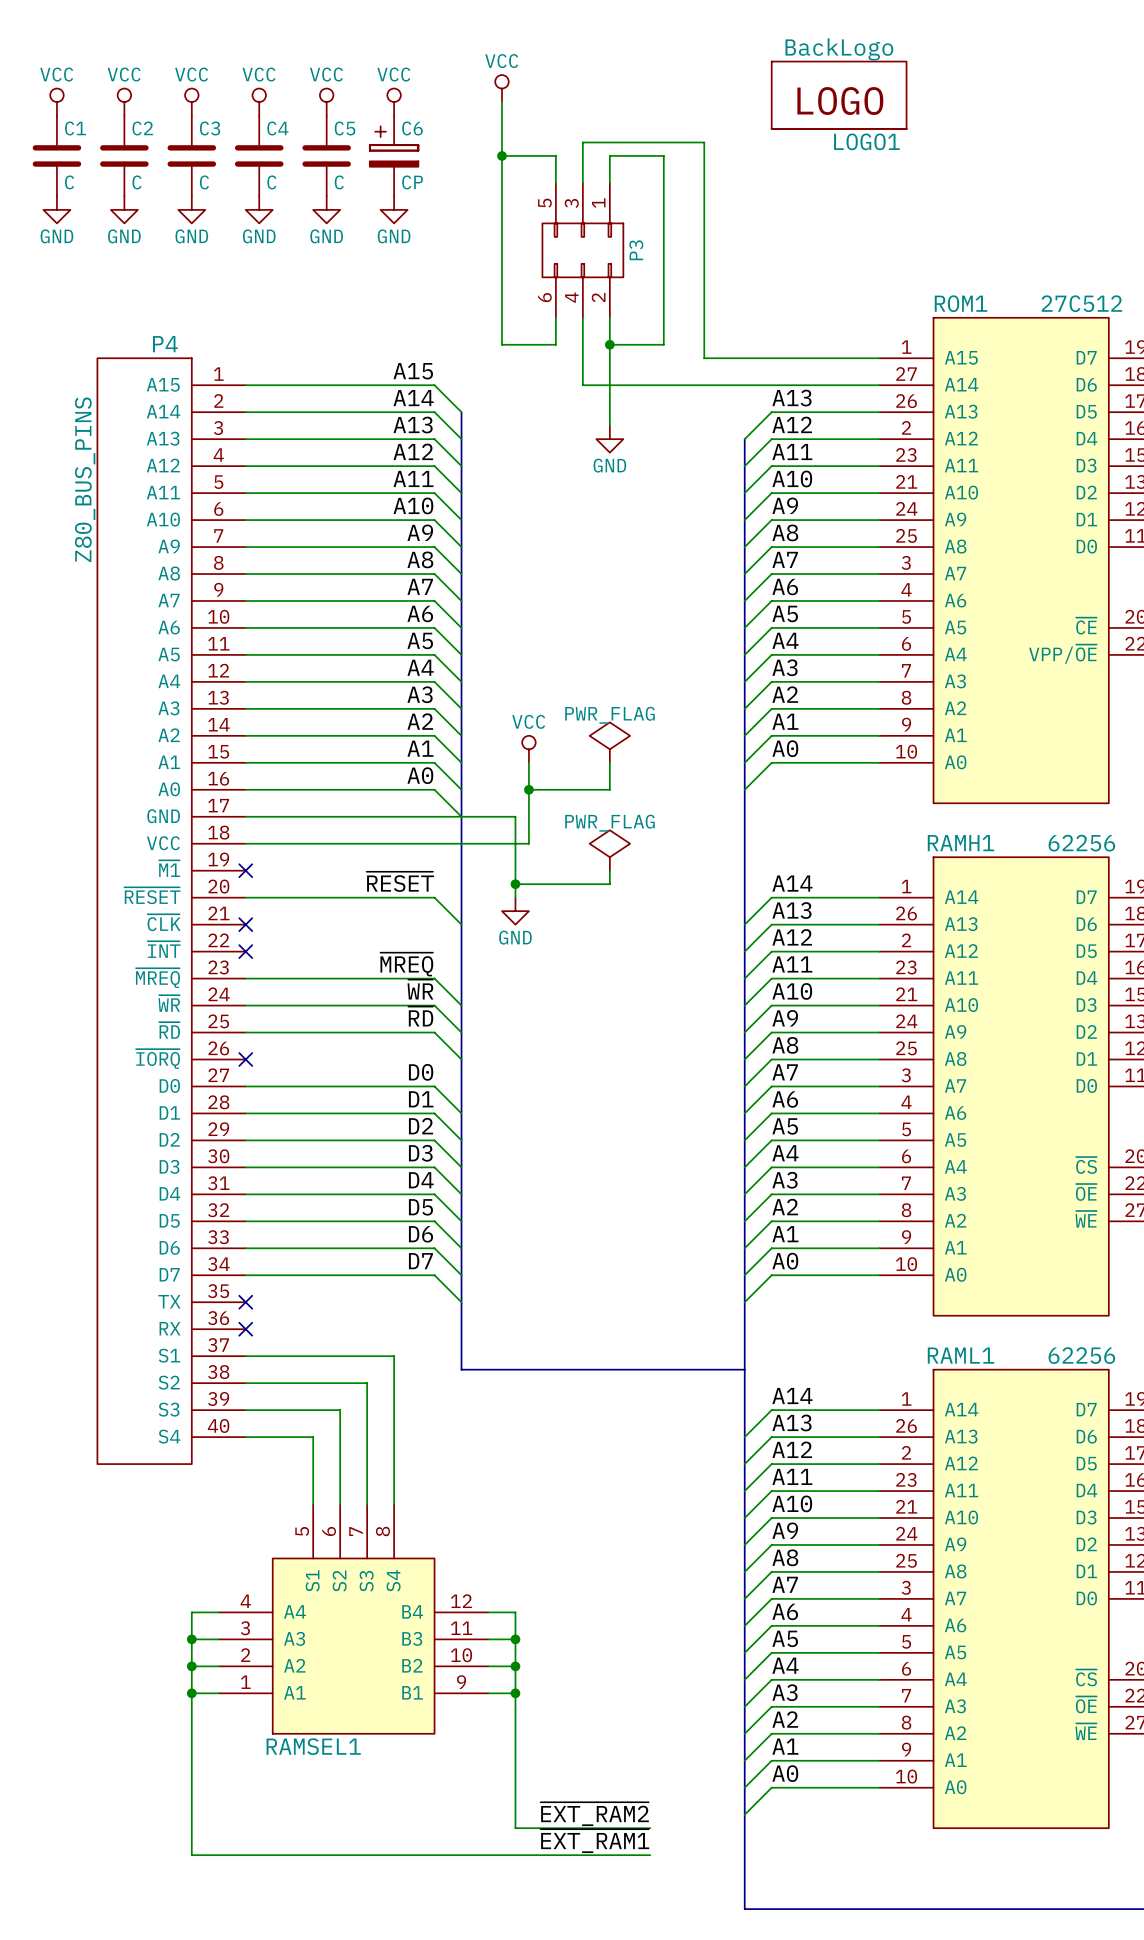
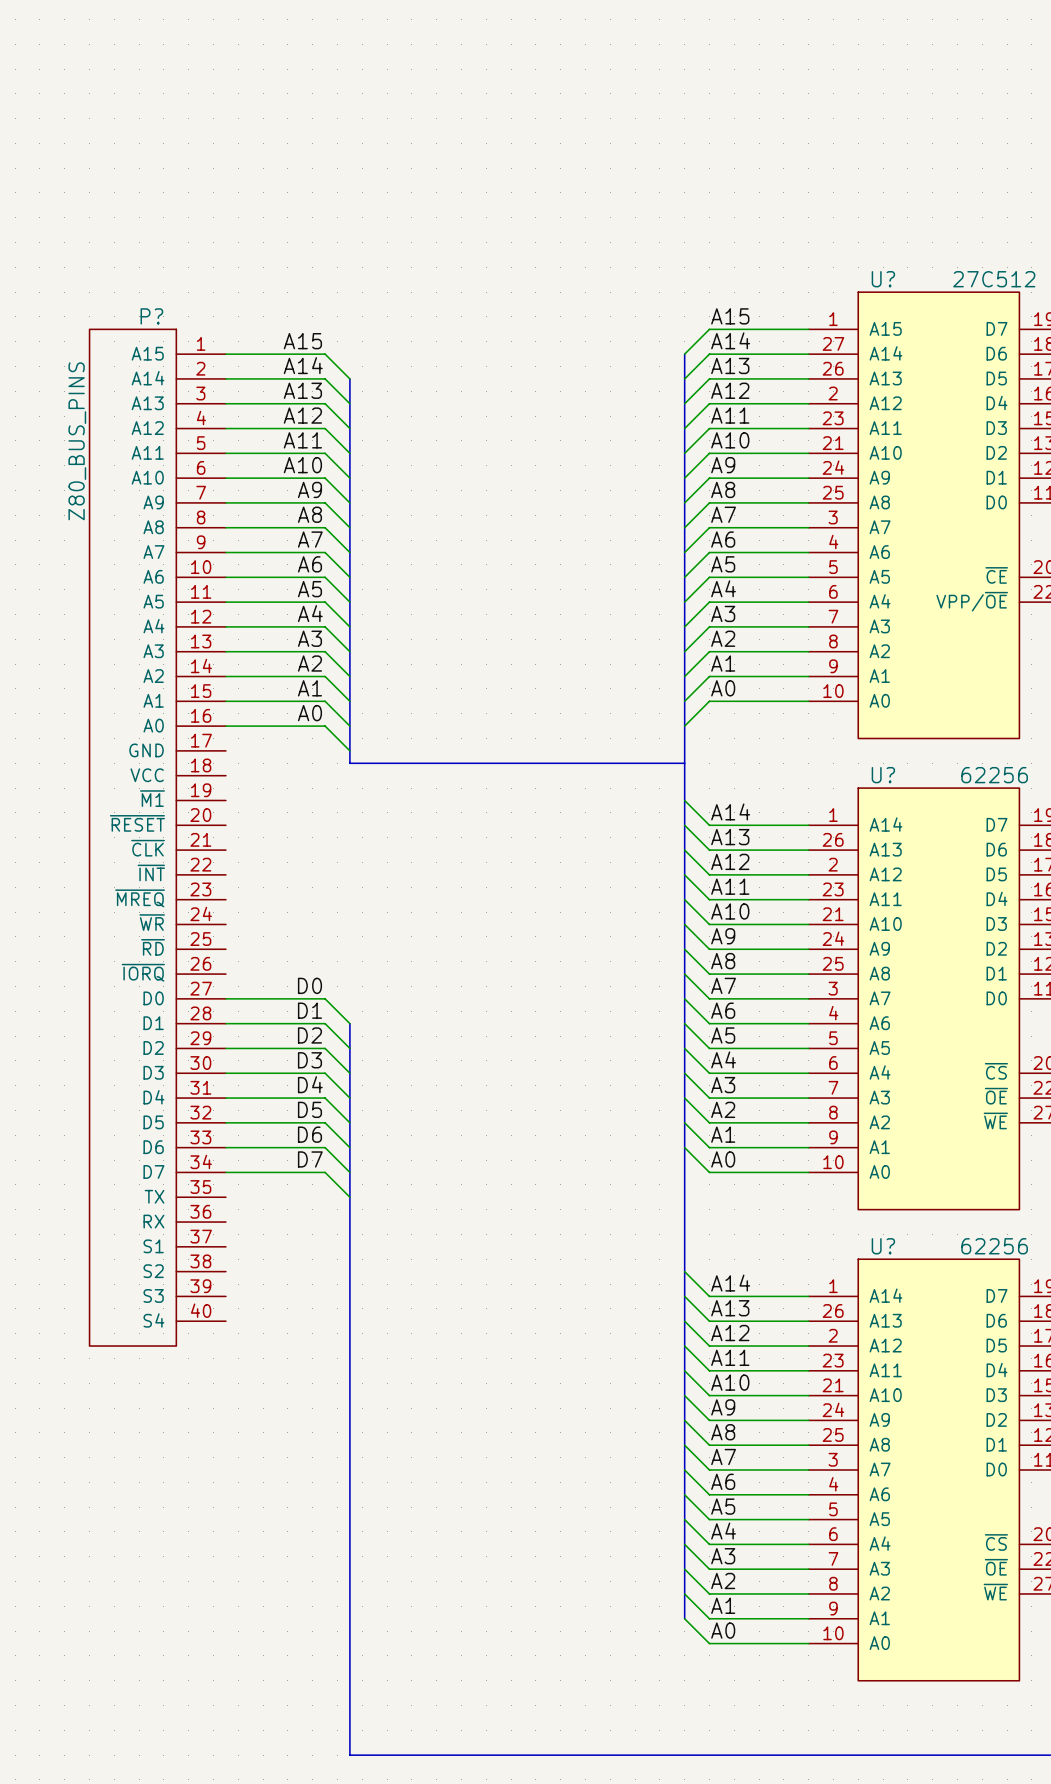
power symbol: VCC (501, 88) -> none
LOGO1: BackLogo (839, 95) -> none
power symbol: VCC (56, 102) -> none
power symbol: VCC (124, 102) -> none
power symbol: VCC (191, 102) -> none
power symbol: VCC (259, 102) -> none
power symbol: VCC (326, 102) -> none
power symbol: VCC (394, 102) -> none
wire: (501, 102) (501, 344) (555, 344) (555, 317) -> none
C1: C (56, 155) -> none
C2: C (124, 155) -> none
C3: C (191, 155) -> none
C4: C (259, 155) -> none
C5: C (326, 155) -> none
C6: CP (394, 155) -> none
wire: (501, 155) (555, 155) (555, 182) -> none
junction: (501, 155) -> none
wire: (582, 182) (582, 142) (704, 142) (704, 358) (771, 358) -> (684, 354) (709, 329)
wire: (609, 182) (609, 155) (663, 155) (663, 344) (609, 344) -> none
power symbol: GND (56, 209) -> none
power symbol: GND (124, 209) -> none
power symbol: GND (191, 209) -> none
power symbol: GND (259, 209) -> none
power symbol: GND (326, 209) -> none
power symbol: GND (394, 209) -> none
P3: (582, 250) -> none
ROM1 name: ROM1 (960, 303) -> U? (883, 279)
wire: (582, 317) (582, 385) (771, 385) -> (684, 378) (709, 354)
wire: (609, 317) (609, 425) -> none
P4 name: P4 (165, 344) -> P? (151, 316)
junction: (609, 344) -> none
label: none -> A15 (730, 316)
label position: A15 (413, 371) -> A15 (302, 341)
label: none -> A14 (730, 340)
wire: (353, 385) (434, 385) (461, 412) -> (325, 354) (349, 378)
bus: none -> (684, 354) (684, 403)
label position: A14 (413, 398) -> A14 (303, 365)
wire: (353, 412) (434, 412) (461, 439) -> (325, 378) (349, 403)
bus: none -> (349, 378) (349, 763) (684, 763)
bus: (461, 412) (461, 1369) (744, 1369) -> none
label position: A13 (413, 425) -> A13 (302, 390)
wire: (353, 439) (434, 439) (461, 466) -> (325, 403) (349, 428)
power symbol: GND (609, 439) -> none
label position: A12 (413, 451) -> A12 (302, 415)
wire: (353, 466) (434, 466) (461, 493) -> (325, 428) (349, 453)
label position: A11 (413, 478) -> A11 (302, 440)
wire: (353, 493) (434, 493) (461, 520) -> (325, 453) (349, 478)
label position: A10 (413, 505) -> A10 (302, 465)
wire: (353, 520) (434, 520) (461, 547) -> (325, 478) (349, 502)
label position: A9 (420, 532) -> A9 (309, 489)
wire: (353, 547) (434, 547) (461, 574) -> (325, 502) (349, 527)
label position: A8 (420, 559) -> A8 (309, 514)
wire: (353, 574) (434, 574) (461, 600) -> (325, 527) (349, 552)
label position: A7 (420, 586) -> A7 (310, 539)
wire: (353, 600) (434, 600) (461, 627) -> (325, 552) (349, 577)
label position: A6 (420, 613) -> A6 (309, 564)
wire: (353, 627) (434, 627) (461, 654) -> (325, 577) (349, 602)
label position: A5 (420, 640) -> A5 (309, 589)
wire: (353, 654) (434, 654) (461, 681) -> (325, 602) (349, 626)
label position: A4 (420, 667) -> A4 (310, 613)
wire: (353, 681) (434, 681) (461, 708) -> (325, 626) (349, 651)
label position: A3 (420, 694) -> A3 (309, 638)
wire: (353, 708) (434, 708) (461, 735) -> (325, 651) (349, 676)
label position: A2 (420, 721) -> A2 (309, 663)
wire: (353, 735) (434, 735) (461, 762) -> (325, 676) (349, 701)
power symbol: PWR_FLAG (609, 742) -> none
label position: A1 (420, 748) -> A1 (309, 688)
power symbol: VCC (528, 749) -> none
wire: (353, 762) (434, 762) (461, 789) -> (325, 701) (349, 726)
wire: (528, 762) (528, 843) (245, 843) -> none
wire: (609, 762) (609, 789) (528, 789) -> none
label position: A0 (420, 775) -> A0 (309, 713)
wire: (353, 789) (434, 789) (461, 816) -> (325, 726) (349, 750)
junction: (528, 789) -> none
wire: (245, 816) (515, 816) (515, 897) -> none
RAMH1 name: RAMH1 (960, 843) -> U? (883, 775)
power symbol: PWR_FLAG (609, 850) -> none
no-connect mark: (245, 870) -> none
wire: (609, 870) (609, 884) (515, 884) -> none
label: ~{RESET} (400, 881) -> none
junction: (515, 884) -> none
wire: (245, 897) (434, 897) (461, 924) -> none
wire: (771, 897) (744, 924) -> (709, 825) (684, 800)
power symbol: GND (515, 911) -> none
no-connect mark: (245, 924) -> none
wire: (771, 924) (744, 951) -> (709, 850) (684, 825)
no-connect mark: (245, 951) -> none
wire: (771, 951) (744, 978) -> (709, 874) (684, 850)
label: ~{MREQ} (406, 964) -> none
wire: (245, 978) (434, 978) (461, 1005) -> none
wire: (771, 978) (744, 1005) -> (709, 899) (684, 874)
label: ~{WR} (420, 989) -> none
wire: (245, 1005) (434, 1005) (461, 1032) -> none
wire: (771, 1005) (744, 1032) -> (709, 924) (684, 899)
label: ~{RD} (420, 1016) -> none
wire: (245, 1032) (434, 1032) (461, 1059) -> none
wire: (771, 1032) (744, 1059) -> (709, 949) (684, 924)
no-connect mark: (245, 1059) -> none
wire: (771, 1059) (744, 1086) -> (709, 974) (684, 949)
label position: D0 (421, 1072) -> D0 (309, 985)
wire: (353, 1086) (434, 1086) (461, 1113) -> (325, 998) (349, 1023)
wire: none -> (684, 998) (709, 1023)
wire: (771, 1086) (744, 1113) -> (709, 998) (684, 974)
label position: D1 (421, 1099) -> D1 (309, 1010)
wire: (353, 1113) (434, 1113) (461, 1140) -> (325, 1023) (349, 1048)
wire: (771, 1113) (744, 1140) -> (709, 1073) (684, 1048)
label position: D2 (421, 1126) -> D2 (309, 1035)
wire: (353, 1140) (434, 1140) (461, 1167) -> (325, 1048) (349, 1073)
wire: (771, 1140) (744, 1167) -> (709, 1048) (684, 1023)
label position: D3 (420, 1153) -> D3 (309, 1060)
wire: (353, 1167) (434, 1167) (461, 1194) -> (325, 1073) (349, 1098)
wire: (771, 1167) (744, 1194) -> (709, 1122) (684, 1098)
label position: D4 (421, 1180) -> D4 (310, 1084)
wire: (353, 1194) (434, 1194) (461, 1221) -> (325, 1098) (349, 1122)
wire: (771, 1194) (744, 1221) -> (709, 1098) (684, 1073)
label position: D5 (420, 1207) -> D5 (309, 1109)
wire: (353, 1221) (434, 1221) (461, 1248) -> (325, 1122) (349, 1147)
wire: (771, 1221) (744, 1248) -> (709, 1172) (684, 1147)
label position: D6 (421, 1234) -> D6 (309, 1134)
wire: (353, 1248) (434, 1248) (461, 1275) -> (325, 1147) (349, 1172)
wire: (771, 1248) (744, 1275) -> (709, 1147) (684, 1122)
label position: D7 (420, 1261) -> D7 (310, 1159)
wire: (353, 1275) (434, 1275) (461, 1302) -> (325, 1172) (349, 1197)
wire: (771, 1275) (744, 1302) -> none
no-connect mark: (245, 1302) -> none
no-connect mark: (245, 1329) -> none
RAML1 name: RAML1 (960, 1355) -> U? (883, 1246)
wire: (245, 1356) (394, 1356) (394, 1504) -> none
wire: (245, 1383) (367, 1383) (367, 1504) -> none
wire: (245, 1410) (340, 1410) (340, 1504) -> none
wire: (771, 1410) (744, 1437) -> (709, 1296) (684, 1271)
wire: (245, 1437) (313, 1437) (313, 1504) -> none
wire: none -> (684, 1321) (709, 1346)
wire: (771, 1437) (744, 1464) -> (709, 1321) (684, 1296)
wire: (771, 1464) (744, 1491) -> (709, 1395) (684, 1370)
wire: (771, 1491) (744, 1518) -> (709, 1370) (684, 1346)
wire: (771, 1518) (744, 1544) -> (709, 1445) (684, 1420)
wire: (771, 1544) (744, 1571) -> (709, 1420) (684, 1395)
wire: (771, 1571) (744, 1598) -> (709, 1494) (684, 1469)
wire: (771, 1598) (744, 1625) -> (709, 1469) (684, 1445)
wire: (218, 1612) (191, 1612) (191, 1855) (650, 1855) -> none
wire: (488, 1612) (515, 1612) (515, 1828) (650, 1828) -> none
RAMSEL1: (353, 1619) -> none
wire: none -> (684, 1494) (709, 1519)
wire: (771, 1625) (744, 1652) -> none
wire: (191, 1639) (218, 1639) -> none
junction: (191, 1639) -> none
wire: (488, 1639) (515, 1639) -> none
junction: (515, 1639) -> none
wire: (771, 1652) (744, 1679) -> (709, 1569) (684, 1544)
wire: (191, 1666) (218, 1666) -> none
junction: (191, 1666) -> none
wire: (488, 1666) (515, 1666) -> none
junction: (515, 1666) -> none
wire: (771, 1679) (744, 1706) -> (709, 1544) (684, 1519)
wire: (191, 1693) (218, 1693) -> none
junction: (191, 1693) -> none
wire: (488, 1693) (515, 1693) -> none
junction: (515, 1693) -> none
wire: (771, 1706) (744, 1733) -> (709, 1618) (684, 1593)
wire: (771, 1733) (744, 1760) -> (709, 1593) (684, 1569)
bus: (744, 1760) (744, 1909) -> (349, 1023) (349, 1755) (684, 1755)
wire: (771, 1760) (744, 1787) -> none
wire: (771, 1787) (744, 1814) -> (709, 1643) (684, 1618)
label: ~{EXT_RAM2} (594, 1814) -> none
label: ~{EXT_RAM1} (594, 1841) -> none

